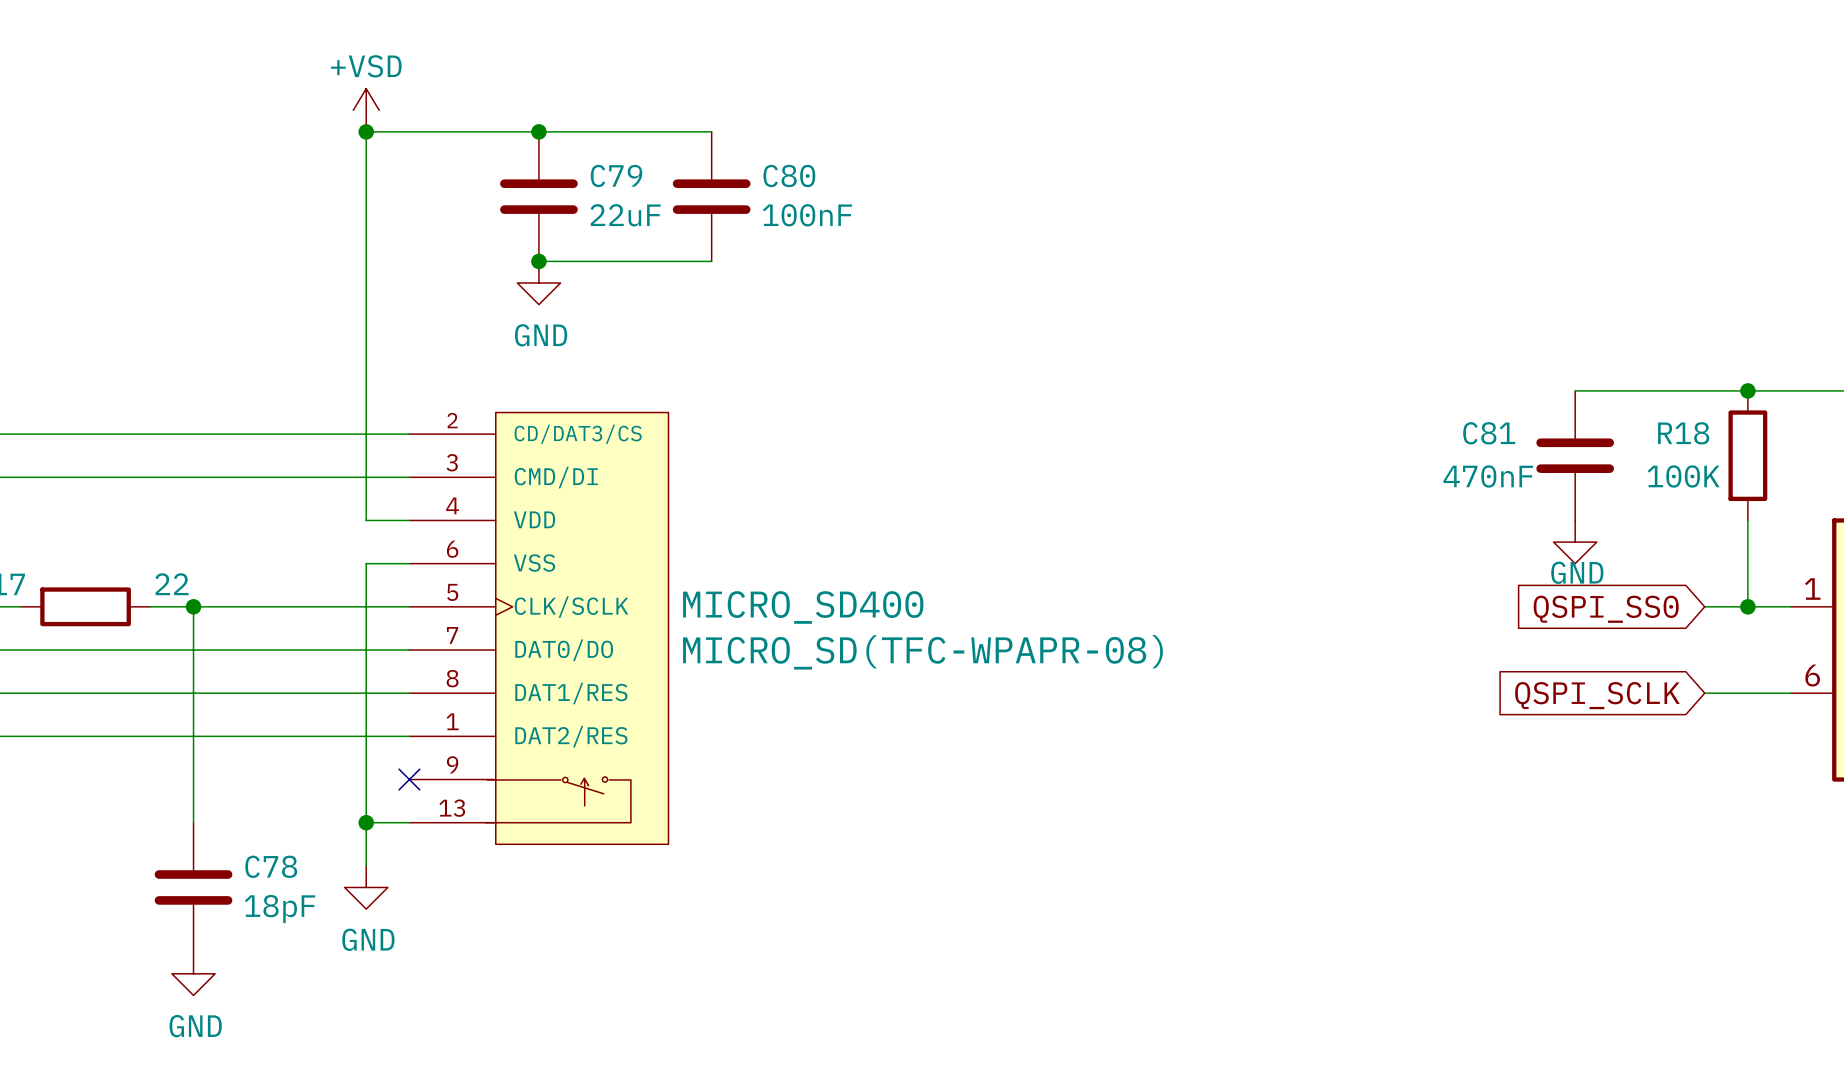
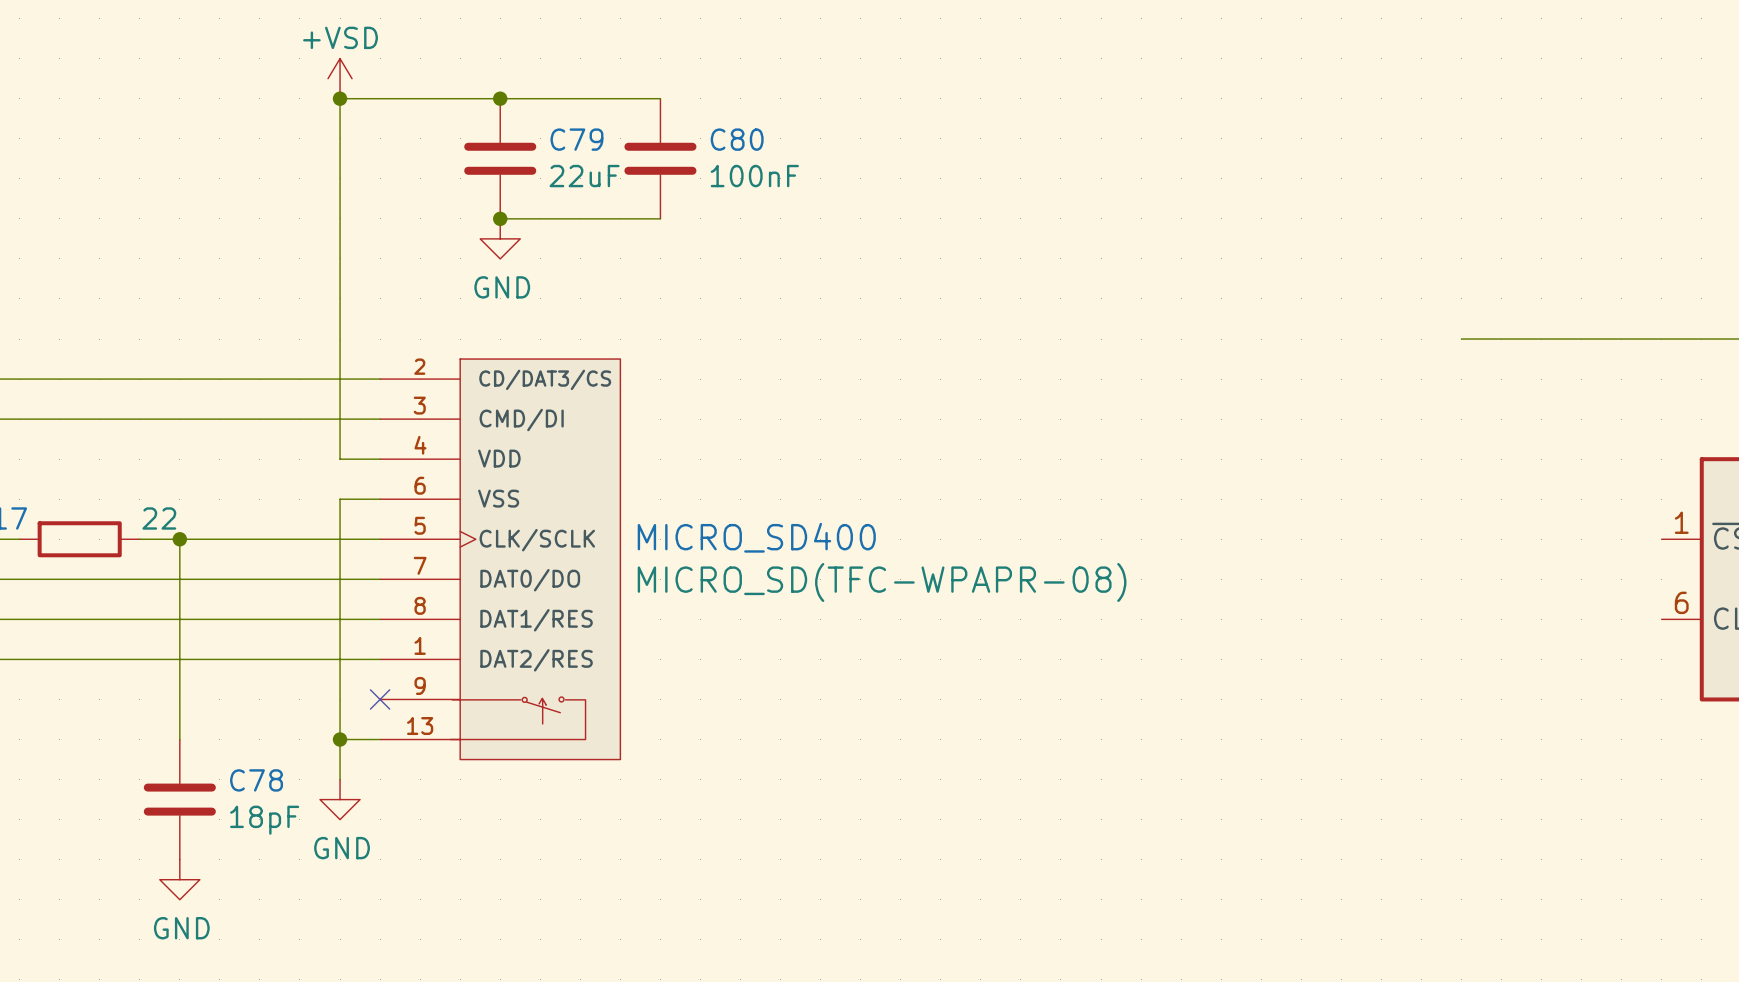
junction: (1747, 390) -> none
C81: 470nF (1575, 455) -> none
R18: 100K (1747, 455) -> none
wire: (1747, 520) (1747, 606) -> none
power symbol: GND (1575, 542) -> none
wire: (1704, 606) (1791, 606) -> none
junction: (1747, 606) -> none
global label: QSPI_SS0 (1606, 609) -> none
wire: (1704, 693) (1791, 693) -> none
global label: QSPI_SCLK (1597, 695) -> none

